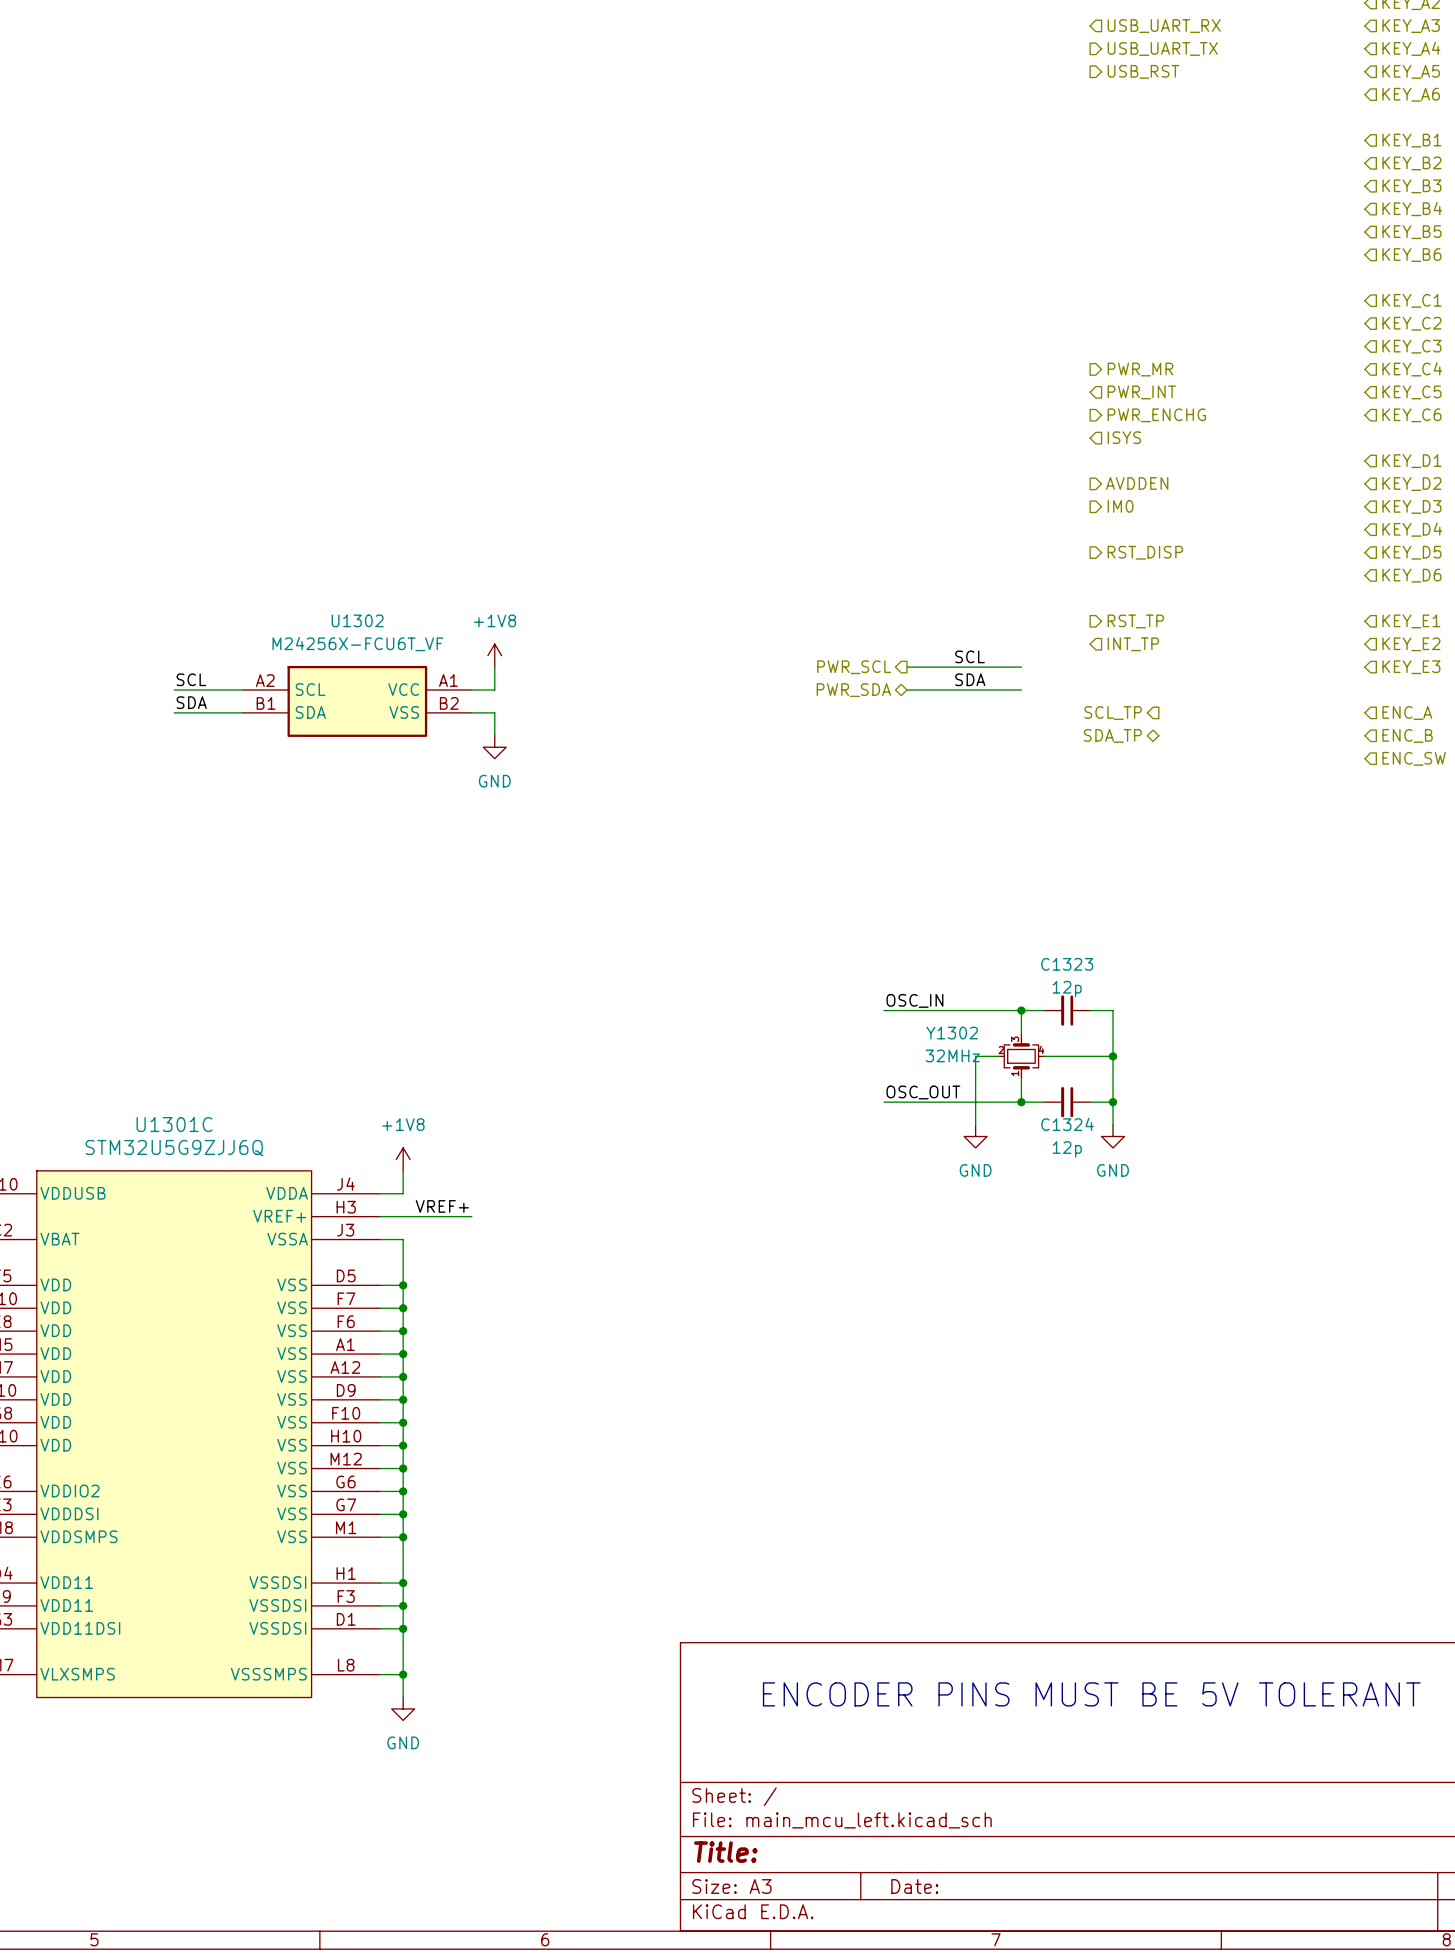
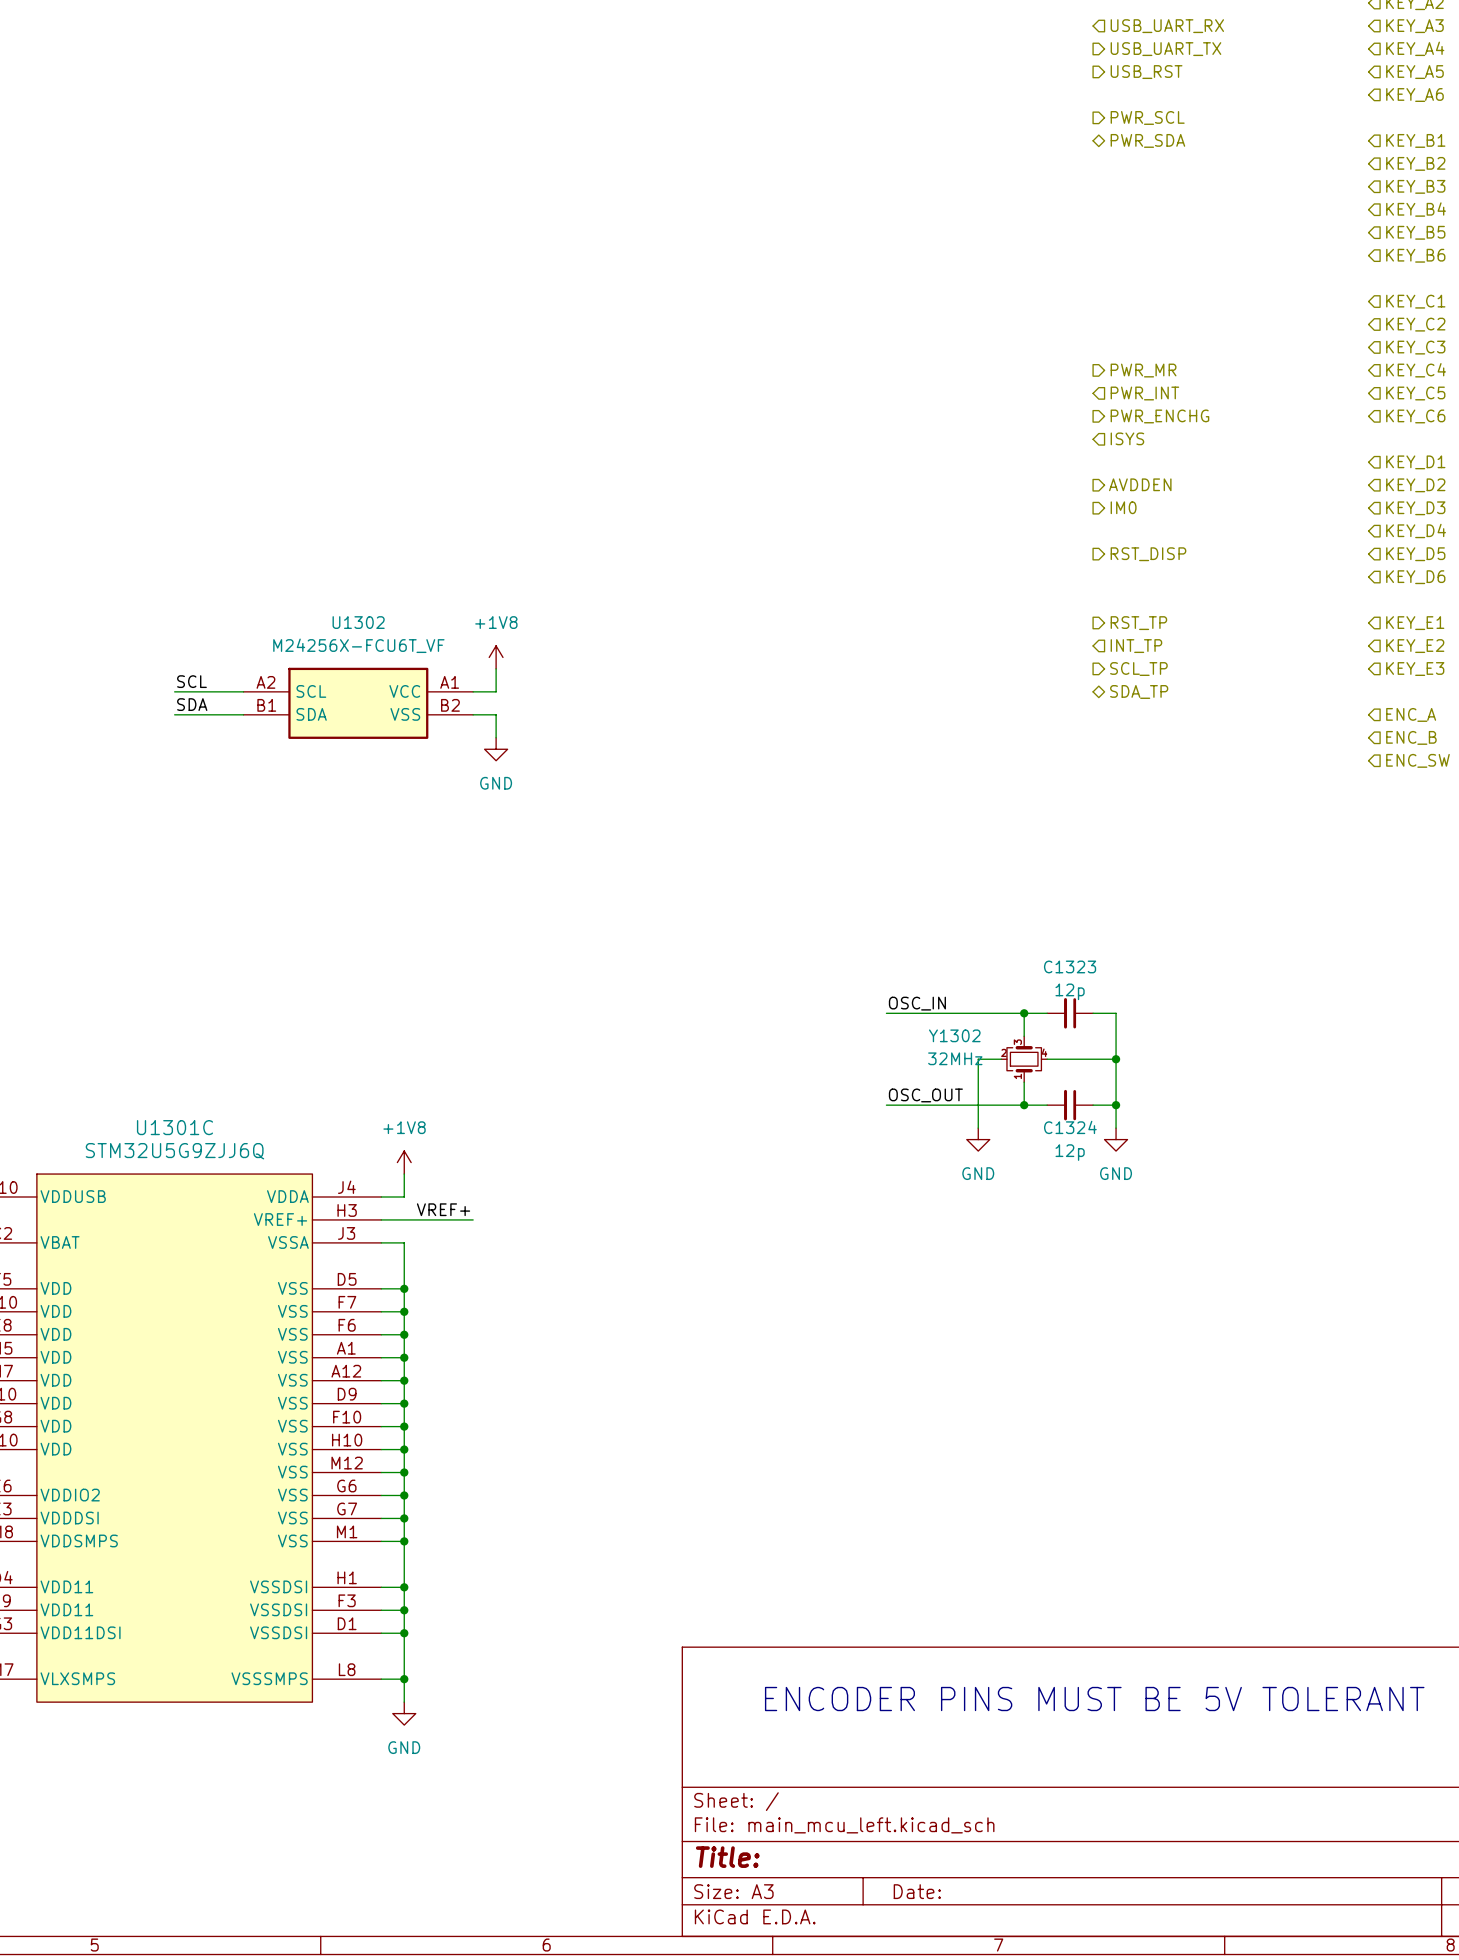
hierarchical label: none -> PWR_SCL (1147, 117)
hierarchical label: none -> PWR_SDA (1147, 140)
label: SCL (969, 656) -> none
hierarchical label: PWR_SCL (854, 667) -> none
wire: (906, 667) (1021, 667) -> none
label: SDA (970, 679) -> none
wire: (906, 689) (1021, 689) -> none
hierarchical label: PWR_SDA (853, 690) -> none
hierarchical label rotation: 0° (1113, 713) -> 180° (1138, 669)
hierarchical label rotation: 0° (1112, 735) -> 180° (1139, 691)

